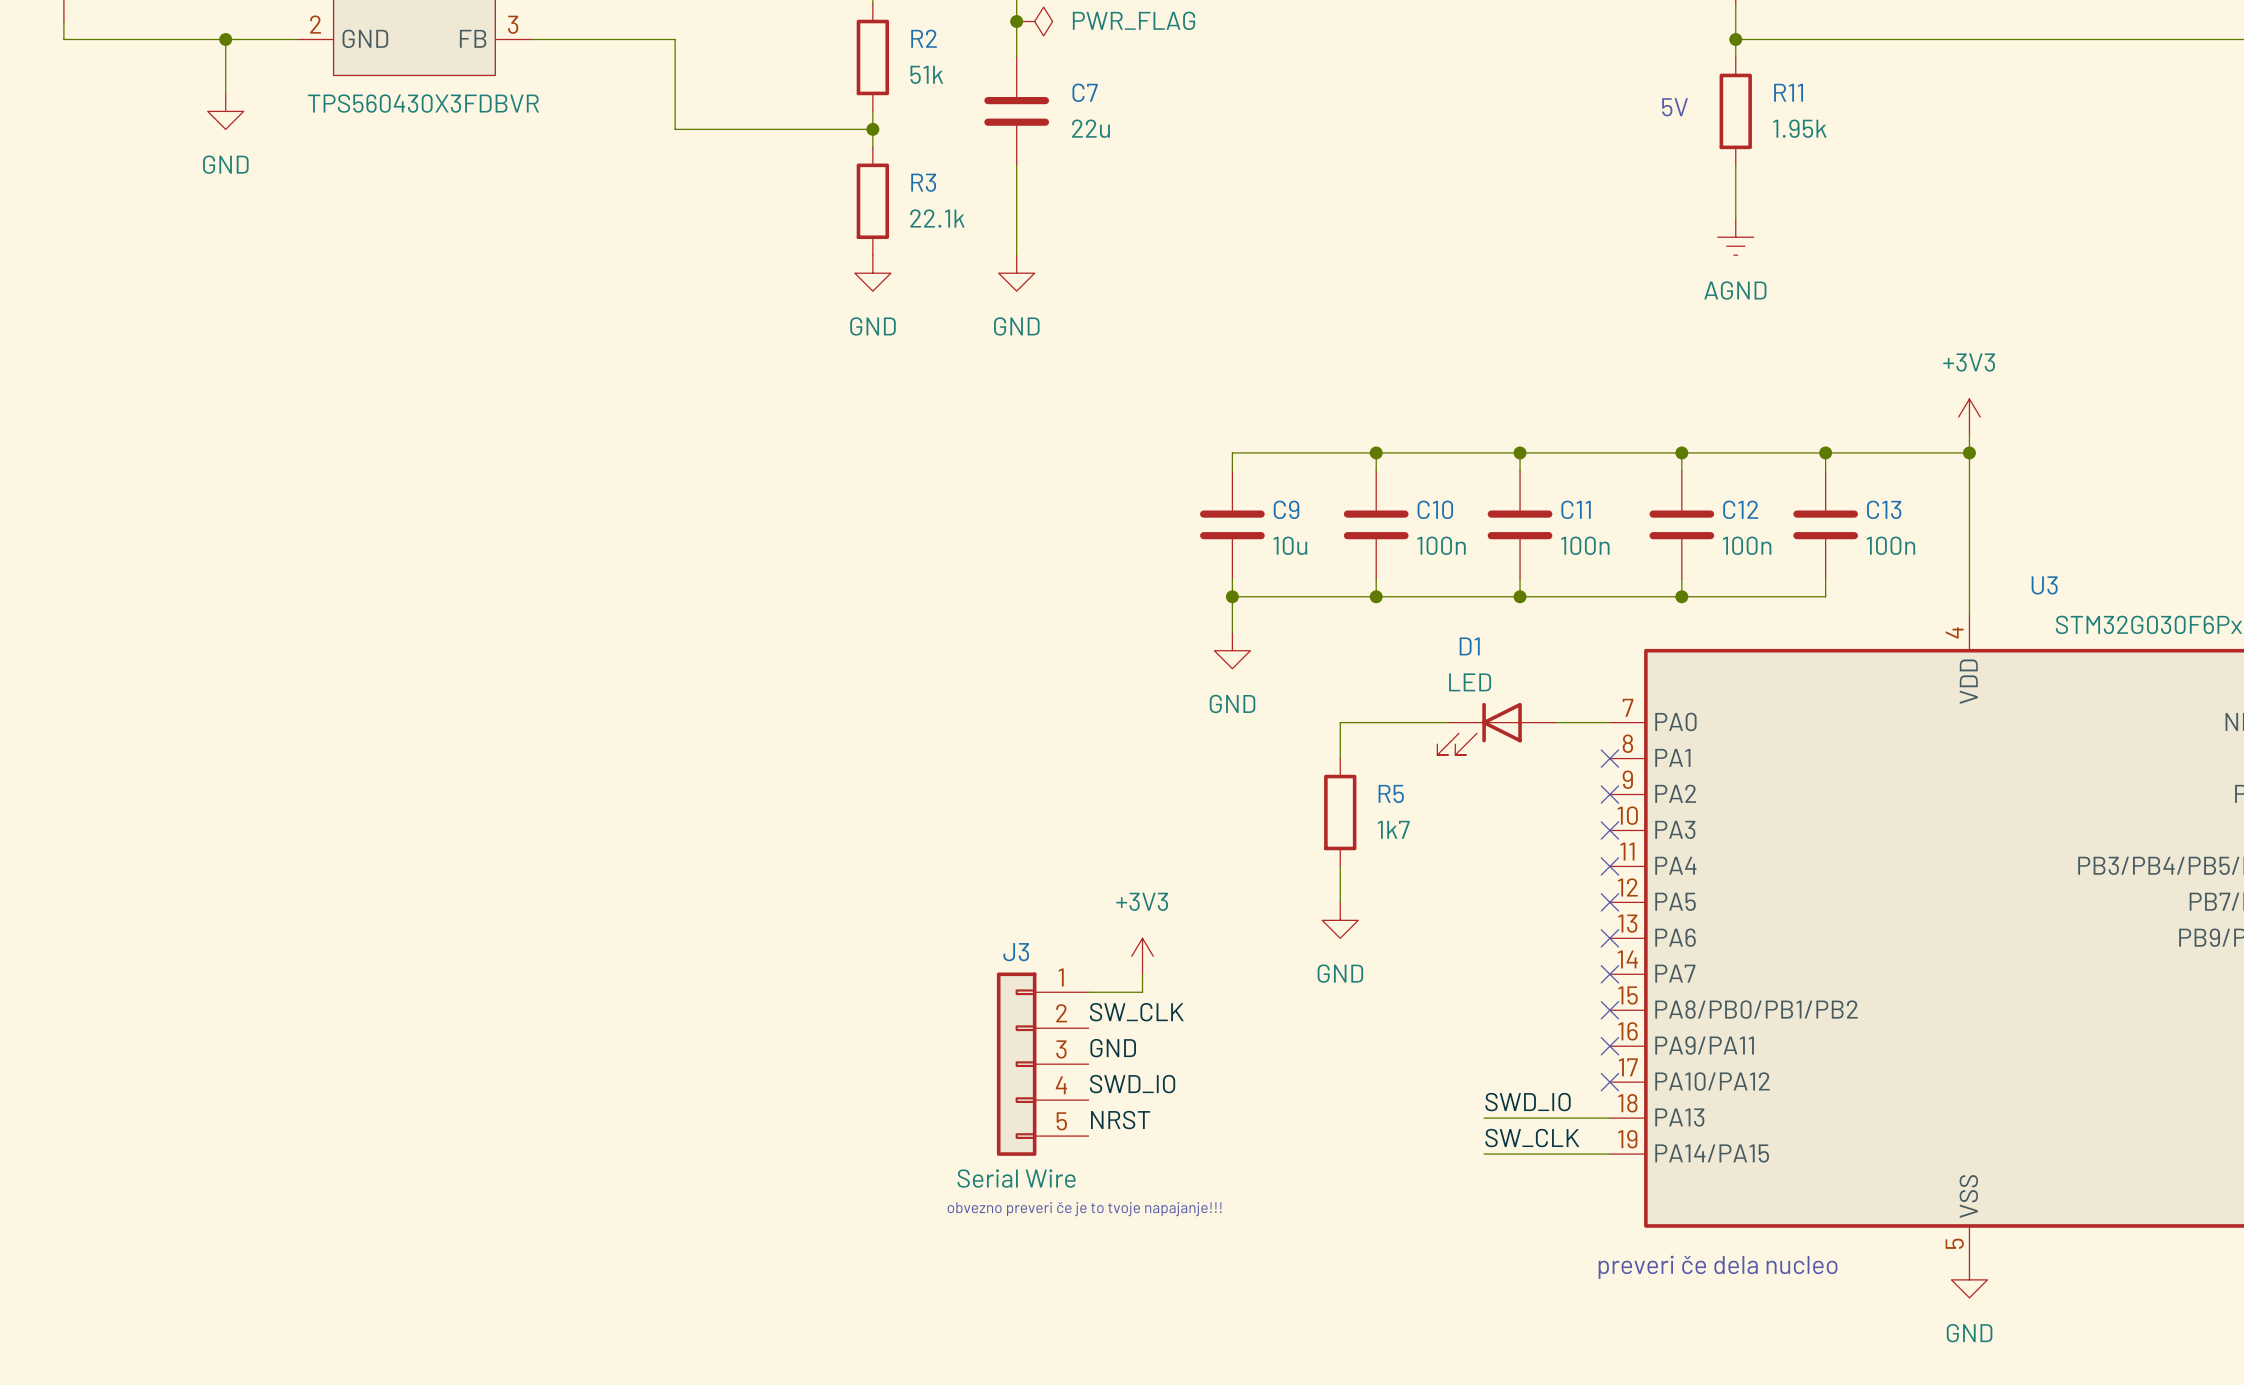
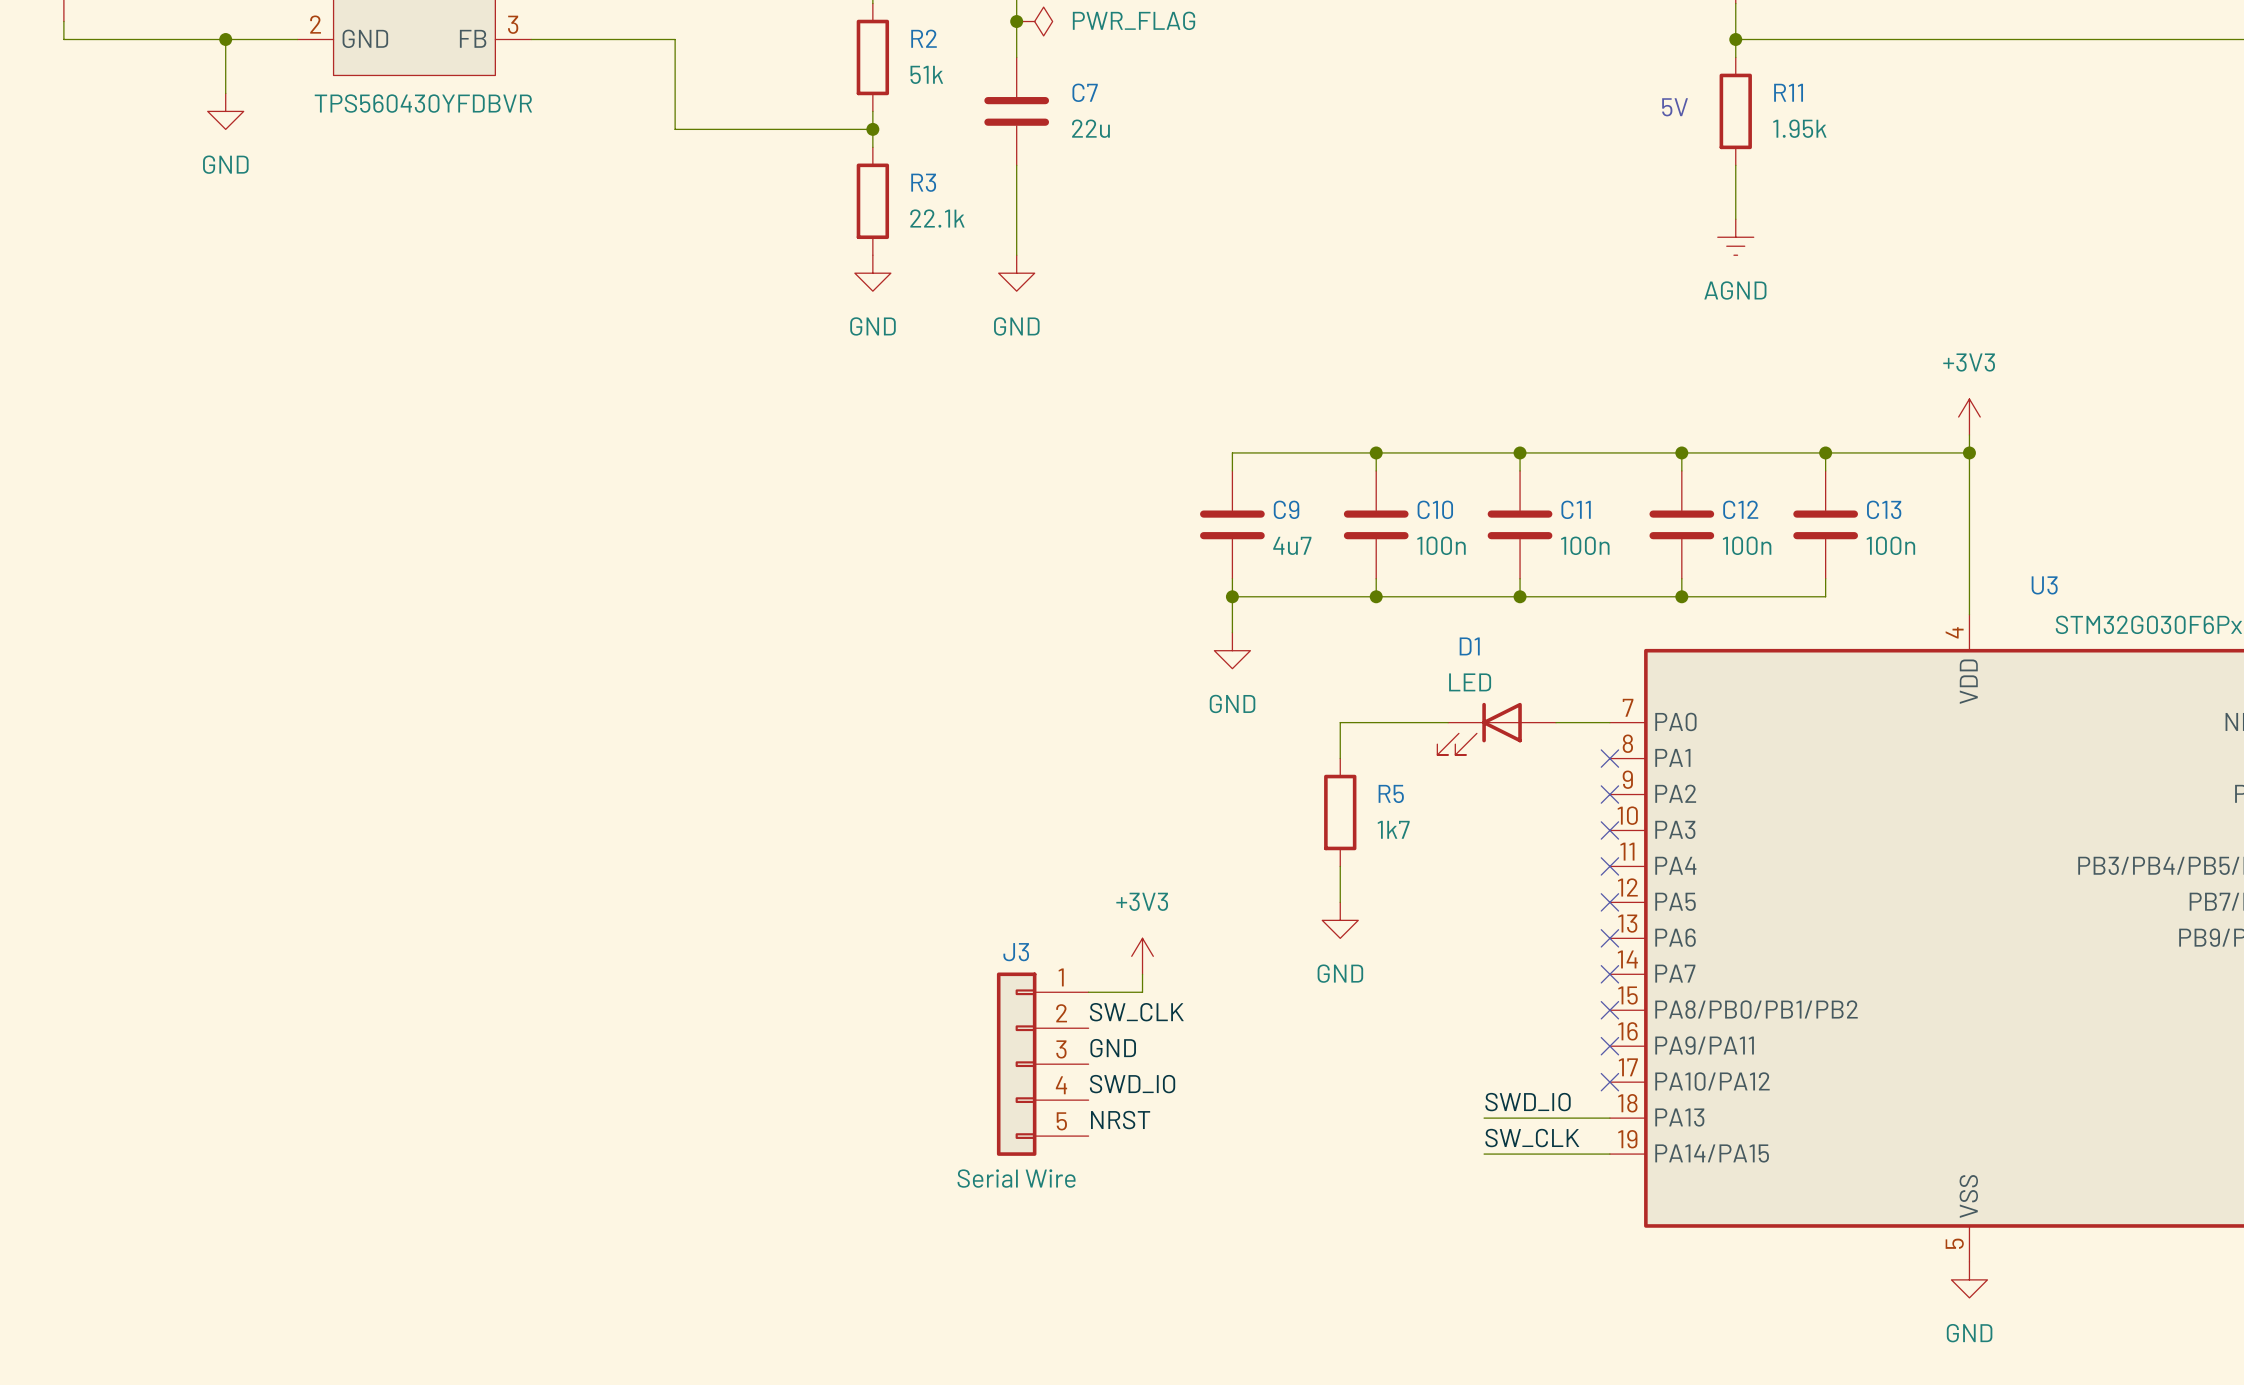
part value: TPS560430X3FDBVR (423, 103) -> TPS560430YFDBVR (423, 103)
C9 value: 10u (1290, 545) -> 4u7 (1292, 545)
text: obvezno preveri če je to tvoje napajanje!!! (1084, 1209) -> none
text: preveri če dela nucleo (1718, 1267) -> none

